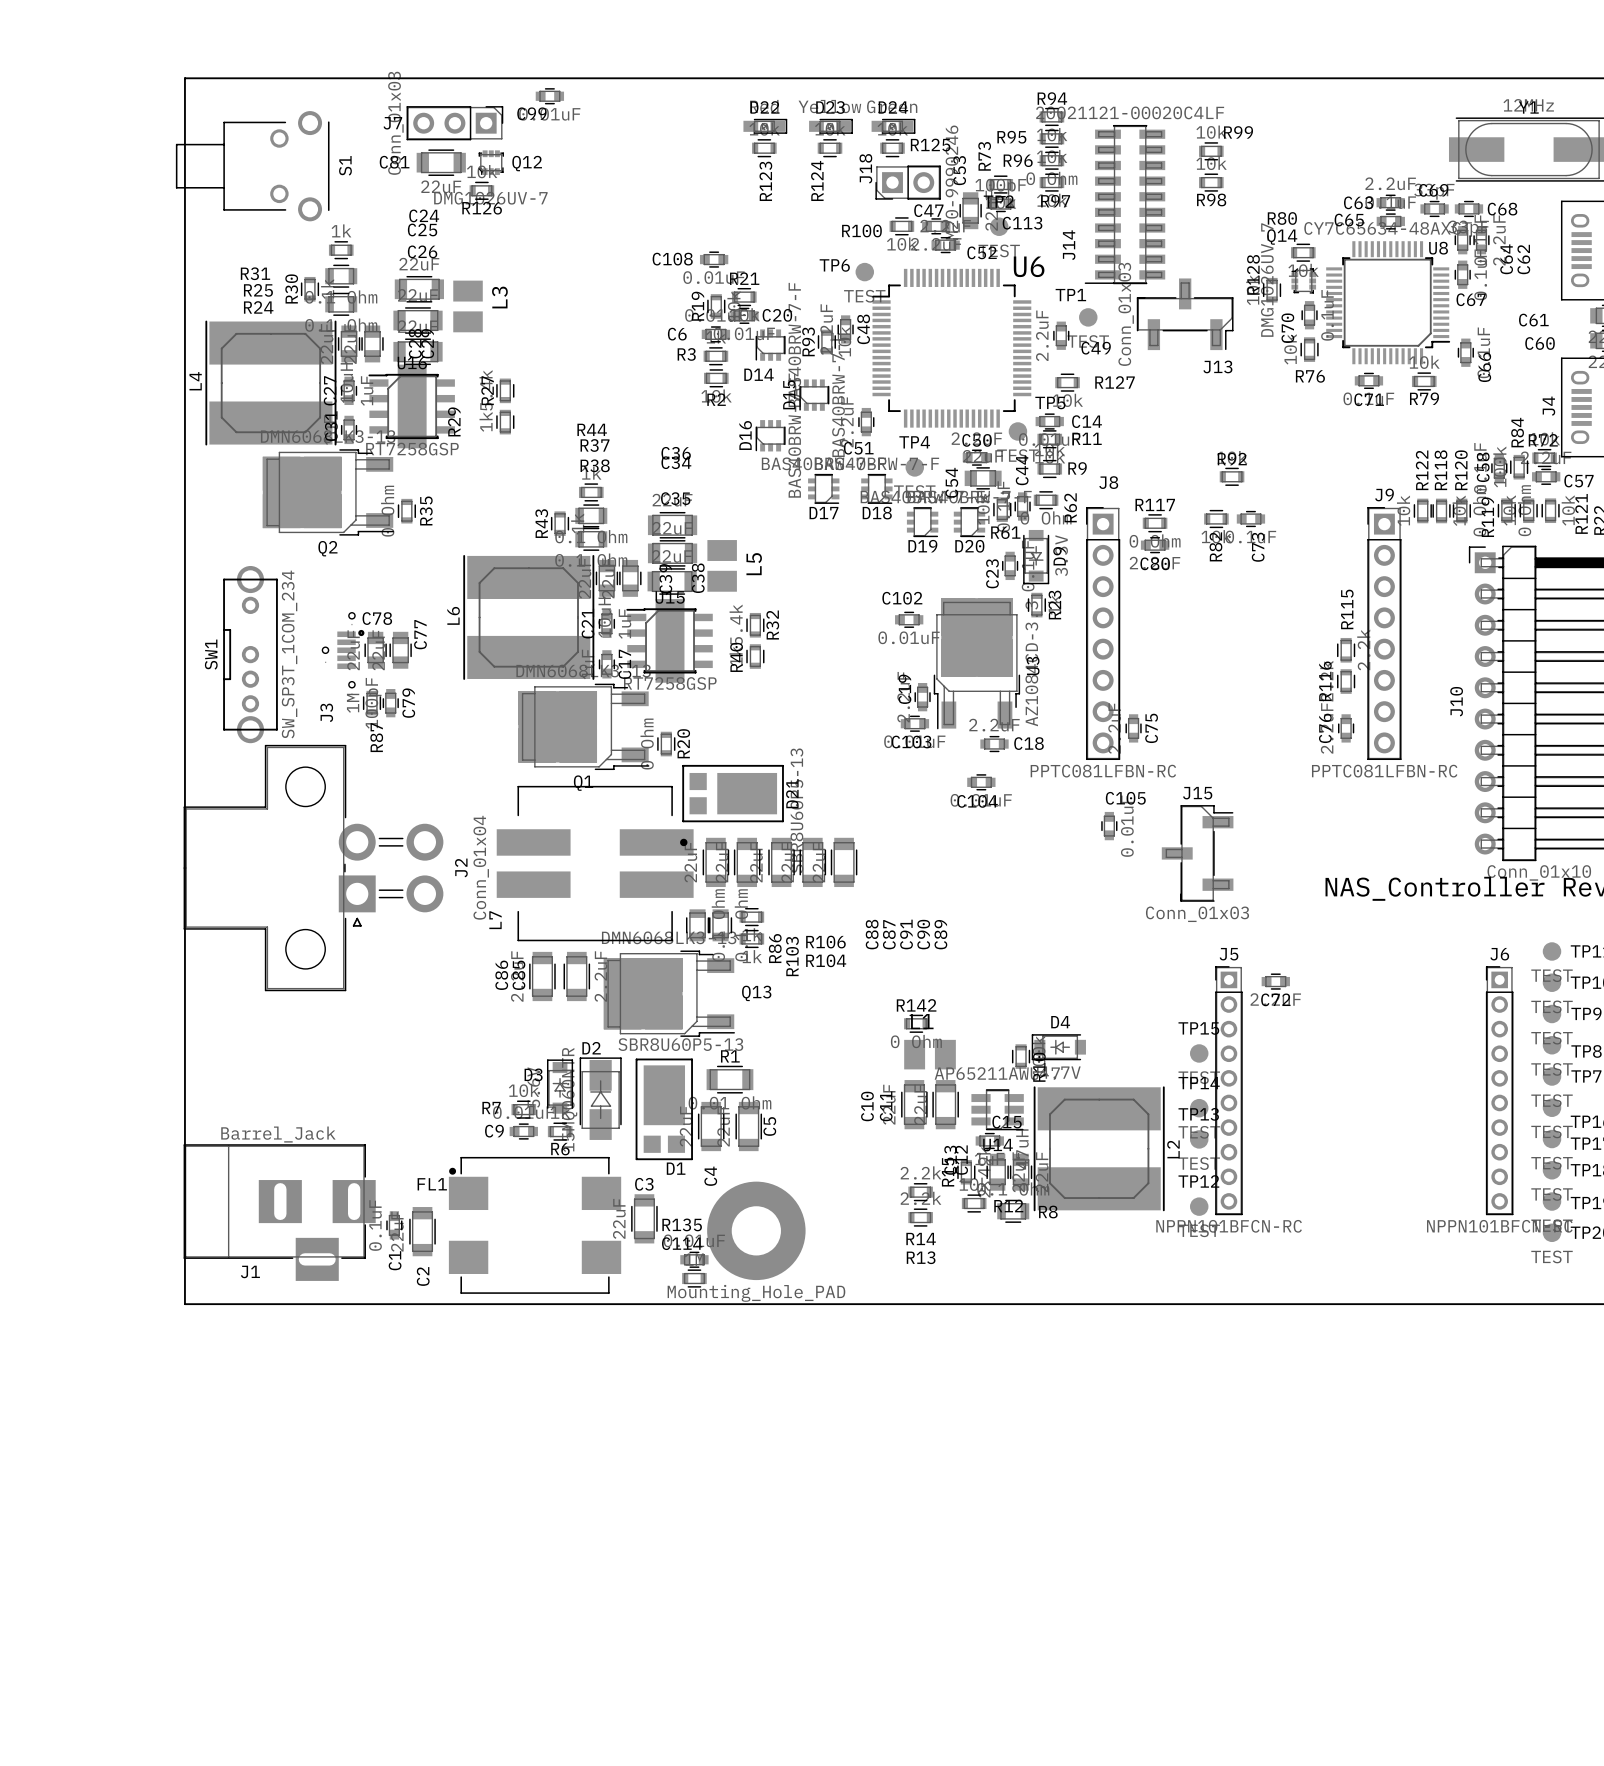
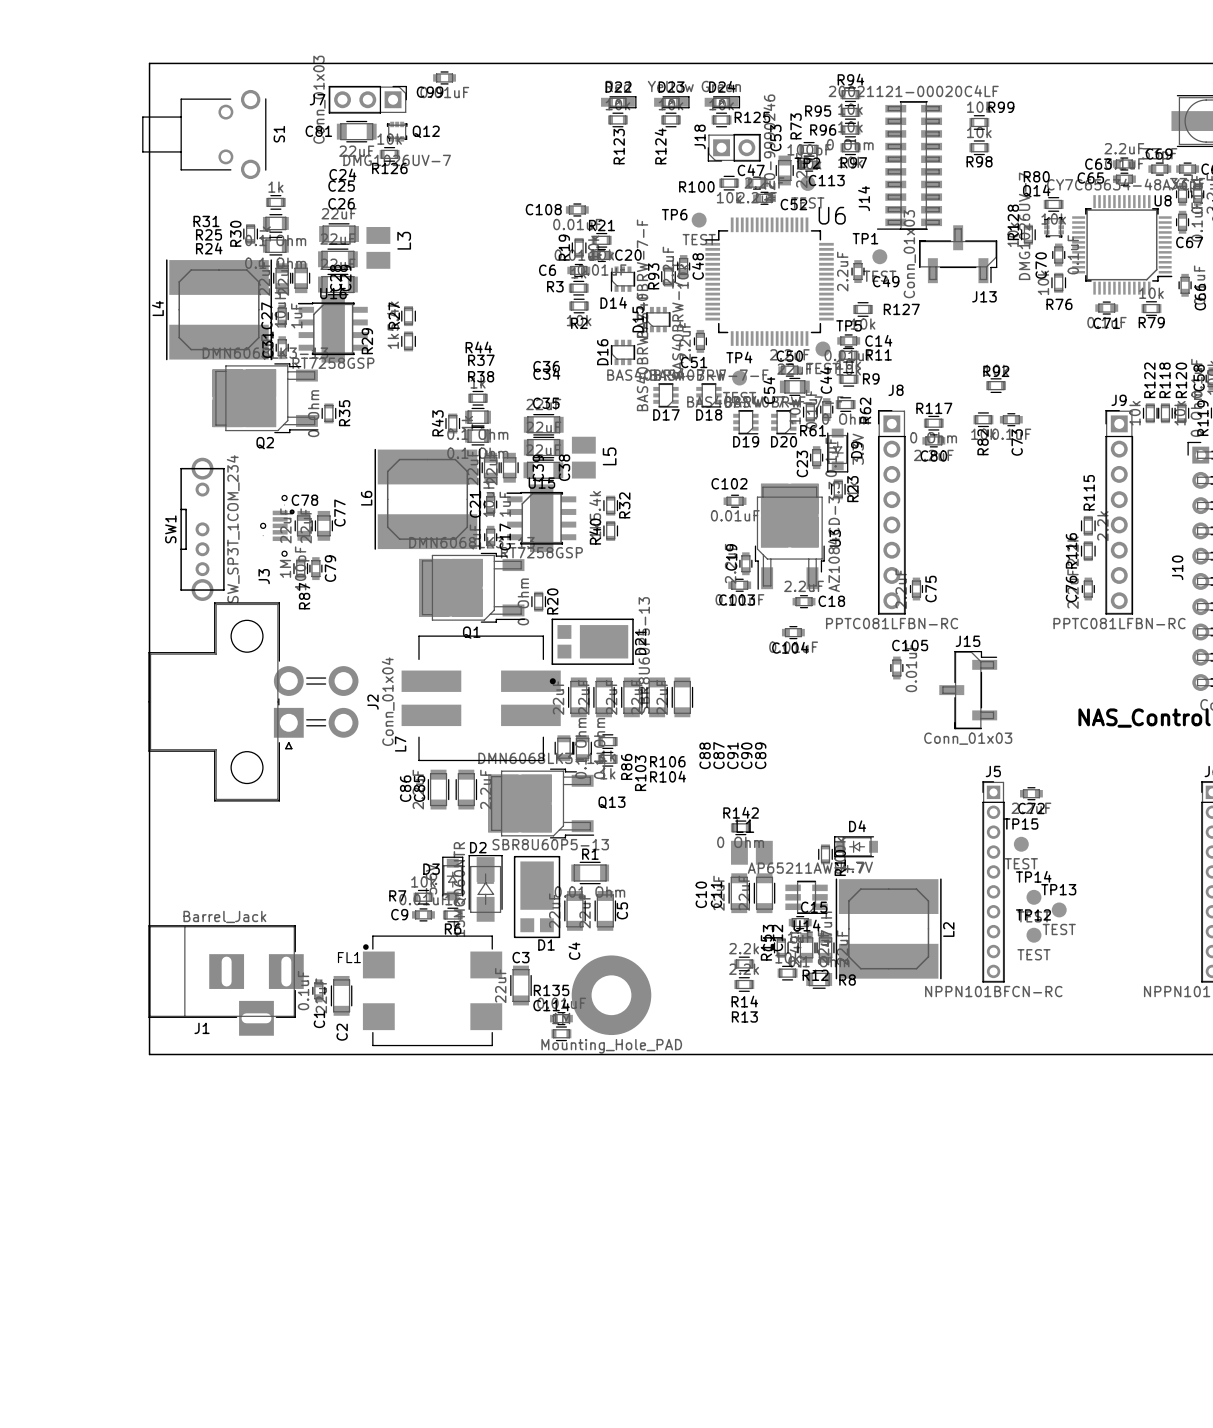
TP15 position: (1199, 1053) -> (1021, 844)
TP14 position: (1199, 1108) -> (1033, 897)
TP13 position: (1199, 1139) -> (1059, 909)
TP12 position: (1199, 1206) -> (1033, 935)

